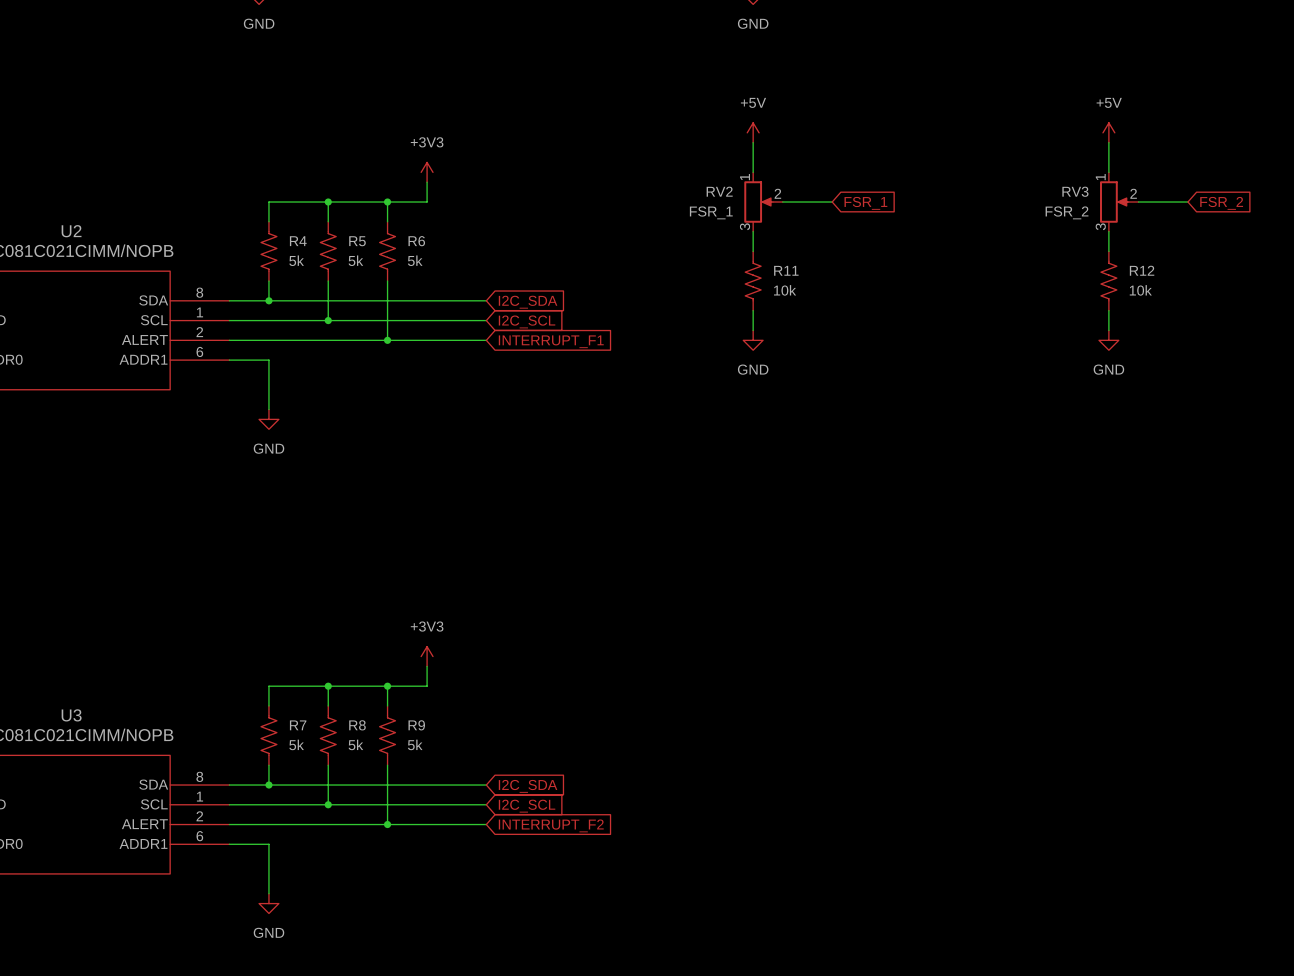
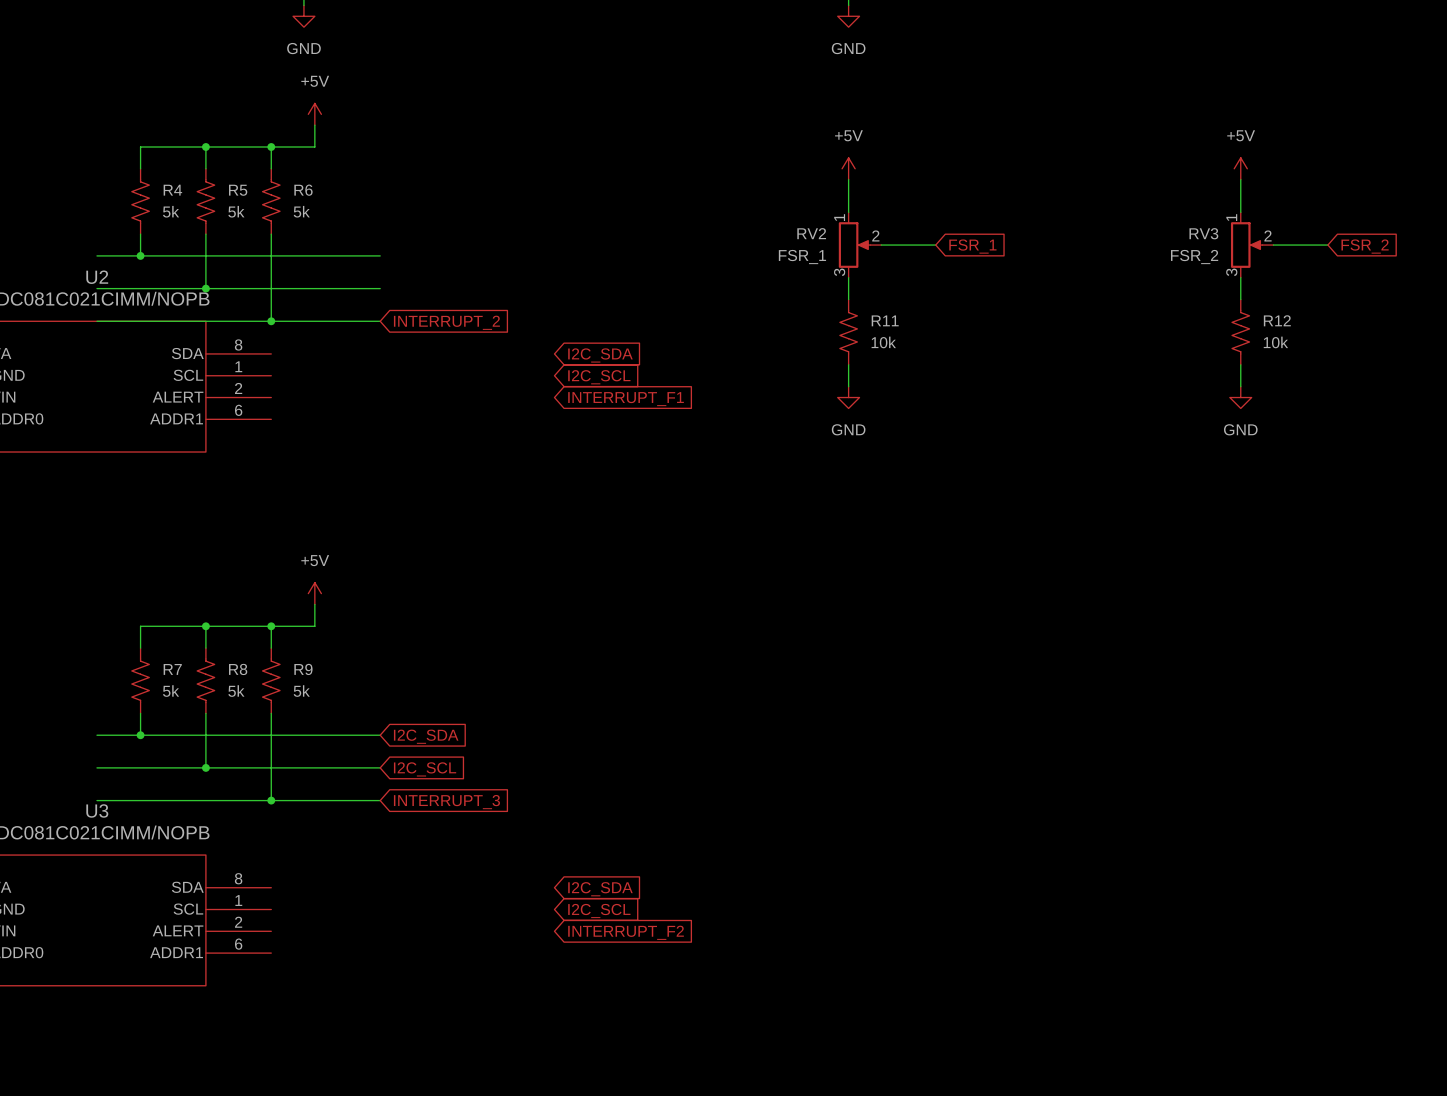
power symbol: none -> +5V (314, 114)
junction: none -> (205, 146)
junction: none -> (271, 146)
power symbol: +3V3 (427, 172) -> none
wire: (427, 182) (427, 202) (268, 202) (268, 221) -> (314, 125) (314, 146) (140, 146) (140, 168)
wire: none -> (205, 234) (205, 288)
wire: none -> (271, 234) (271, 321)
wire: (328, 202) (328, 221) -> (205, 146) (205, 168)
junction: (328, 202) -> none
wire: (387, 202) (387, 221) -> (271, 146) (271, 168)
junction: (387, 202) -> none
junction: none -> (140, 255)
junction: none -> (205, 288)
R4 position: (268, 251) -> (140, 201)
R5 position: (328, 251) -> (205, 201)
R6 position: (387, 251) -> (271, 201)
junction: none -> (271, 321)
global label: none -> INTERRUPT_2 (446, 322)
wire: (268, 281) (268, 300) -> (140, 234) (140, 255)
wire: (328, 281) (328, 320) -> none
wire: (387, 281) (387, 340) -> none
wire: (229, 300) (486, 300) -> (96, 255) (380, 255)
junction: (268, 300) -> none
wire: (229, 320) (486, 320) -> (96, 288) (380, 288)
junction: (328, 320) -> none
wire: (229, 340) (486, 340) -> (96, 321) (380, 321)
junction: (387, 340) -> none
wire: (229, 360) (268, 360) (268, 409) -> none
power symbol: GND (268, 419) -> none
power symbol: none -> +5V (314, 593)
wire: none -> (314, 604) (314, 626) (140, 626) (140, 648)
wire: none -> (205, 626) (205, 648)
junction: none -> (205, 626)
wire: none -> (271, 626) (271, 648)
junction: none -> (271, 626)
wire: none -> (140, 713) (140, 735)
wire: none -> (205, 713) (205, 767)
wire: none -> (271, 713) (271, 800)
wire: none -> (96, 735) (380, 735)
junction: none -> (140, 735)
global label: none -> I2C_SDA (426, 736)
power symbol: +3V3 (427, 656) -> none
wire: (427, 666) (427, 686) (268, 686) (268, 705) -> none
junction: none -> (205, 767)
global label: none -> I2C_SCL (425, 769)
wire: (328, 686) (328, 705) -> (96, 800) (380, 800)
junction: (328, 686) -> none
wire: (387, 686) (387, 705) -> none
junction: (387, 686) -> none
junction: none -> (271, 800)
global label: none -> INTERRUPT_3 (446, 802)
R7 position: (268, 735) -> (140, 680)
R8 position: (328, 735) -> (205, 680)
R9 position: (387, 735) -> (271, 680)
wire: (268, 765) (268, 785) -> none
wire: (328, 765) (328, 804) -> none
wire: (387, 765) (387, 824) -> none
wire: (229, 785) (486, 785) -> (96, 767) (380, 767)
junction: (268, 785) -> none
wire: (229, 804) (486, 804) -> none
junction: (328, 804) -> none
wire: (229, 824) (486, 824) -> none
junction: (387, 824) -> none
wire: (229, 844) (268, 844) (268, 893) -> none
power symbol: GND (268, 903) -> none

